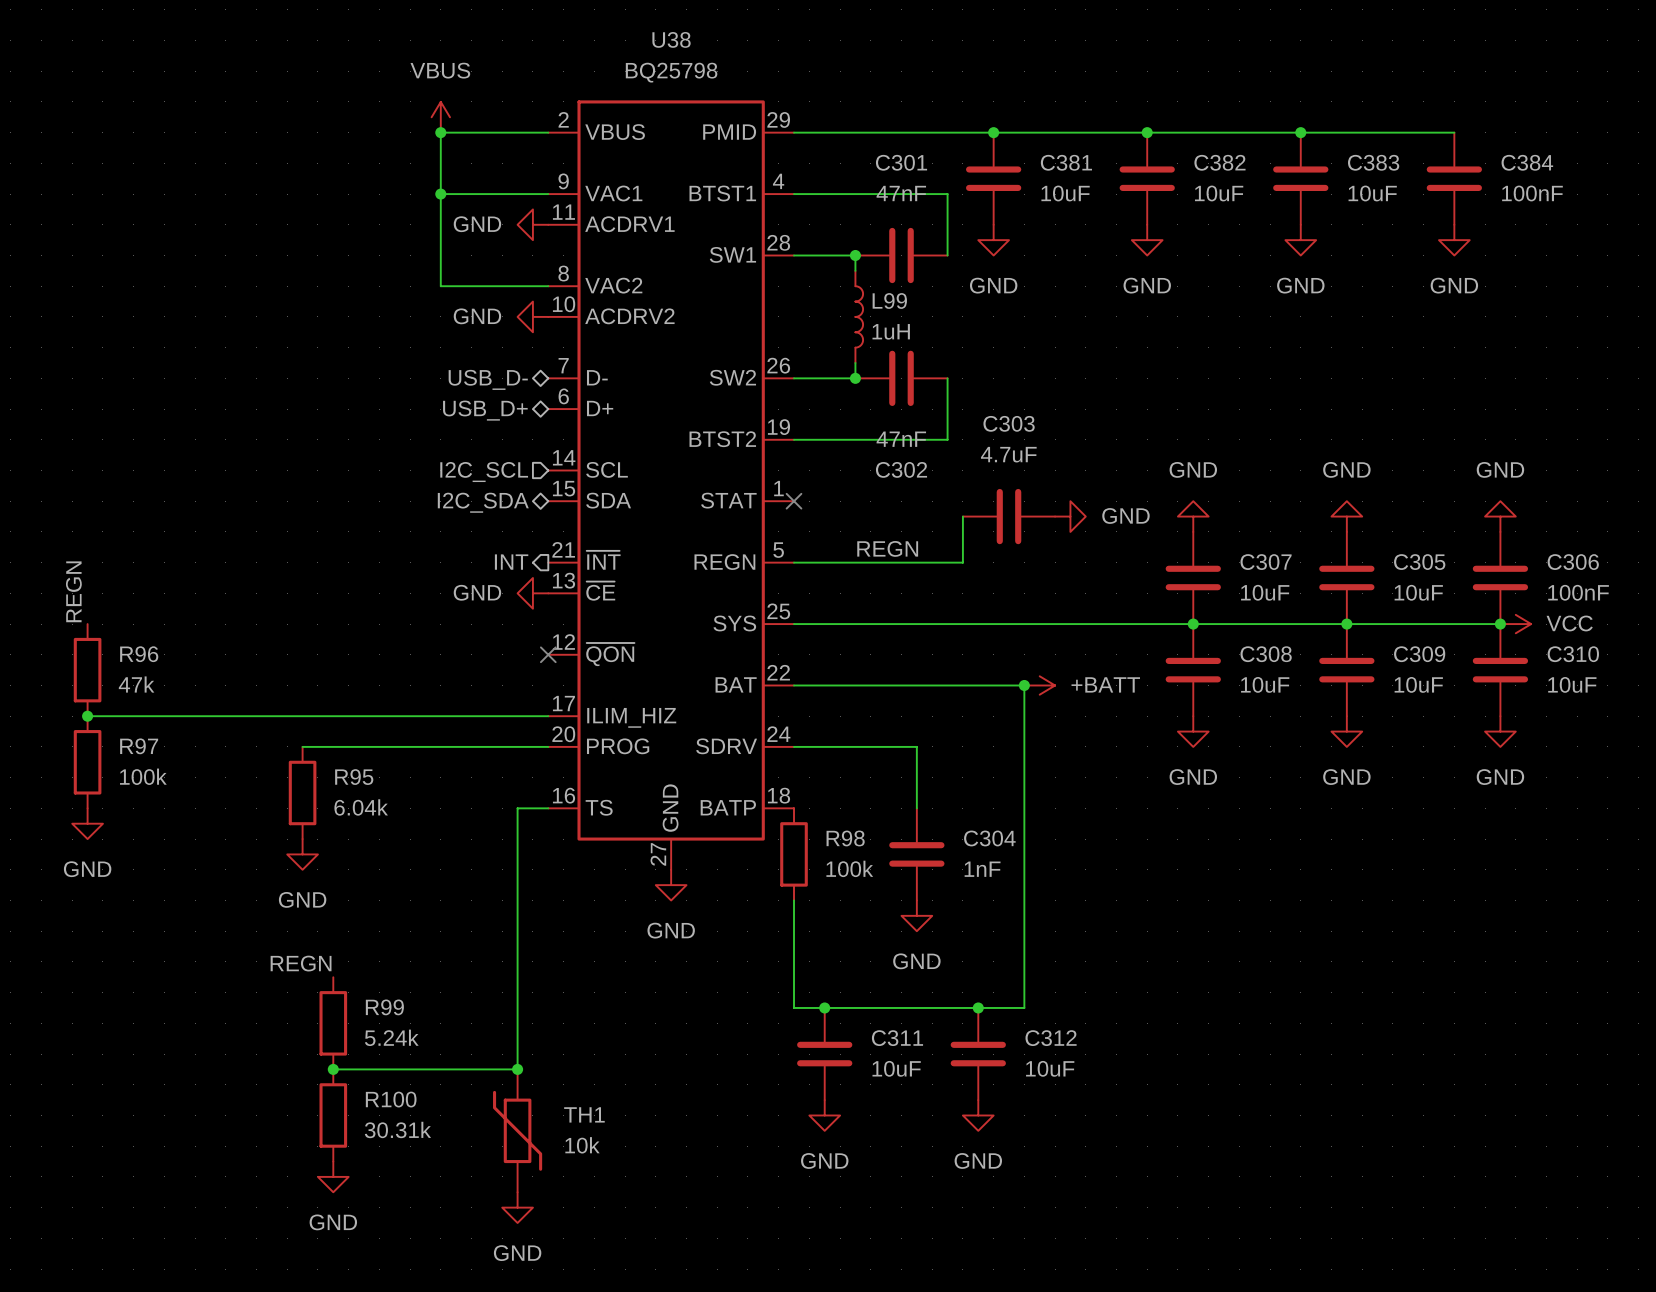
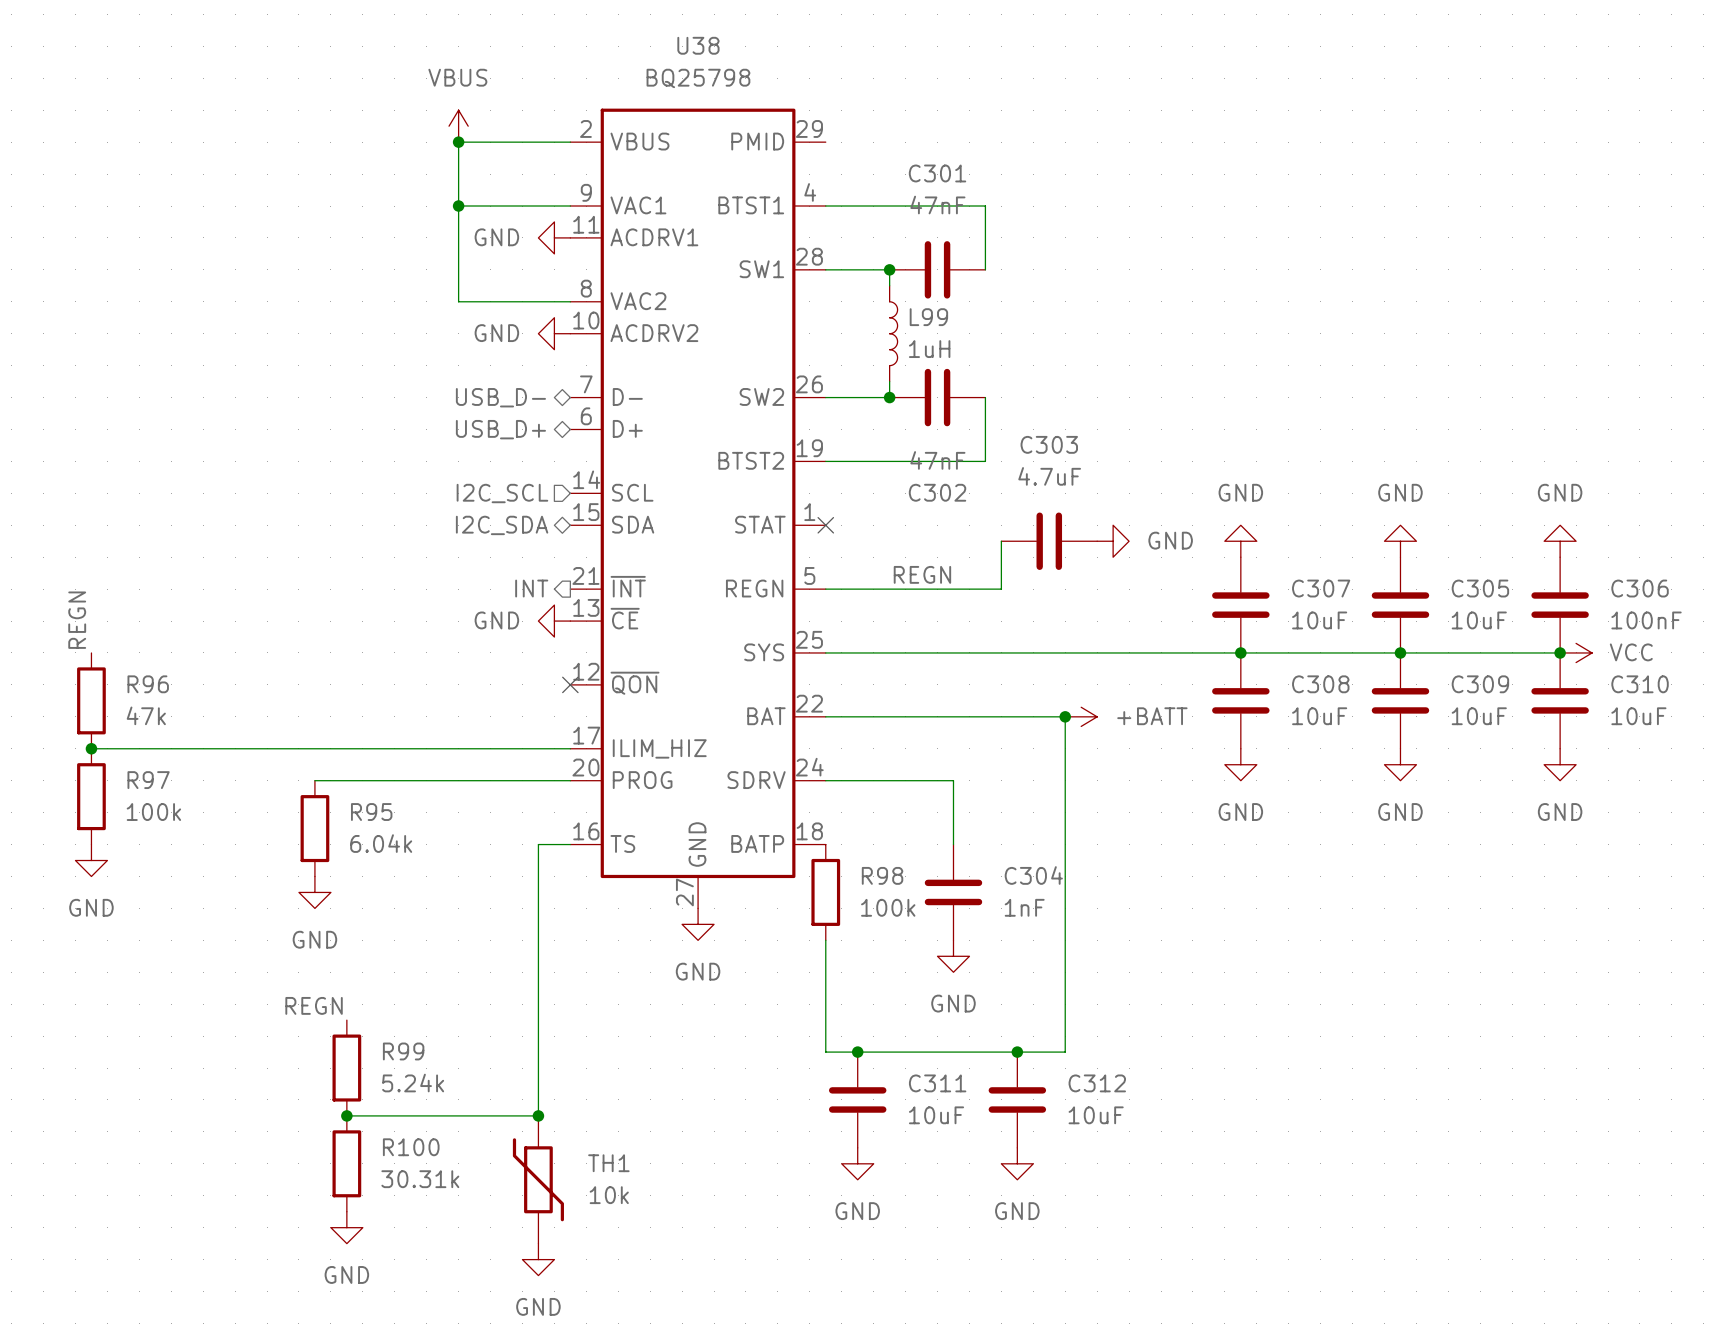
wire: (794, 132) (1454, 132) -> none
junction: (993, 132) -> none
junction: (1147, 132) -> none
junction: (1300, 132) -> none
C381: 10uF (993, 178) -> none
C382: 10uF (1147, 178) -> none
C383: 10uF (1300, 178) -> none
C384: 100nF (1454, 178) -> none
power symbol: GND (993, 240) -> none
power symbol: GND (1147, 240) -> none
power symbol: GND (1300, 240) -> none
power symbol: GND (1454, 240) -> none

